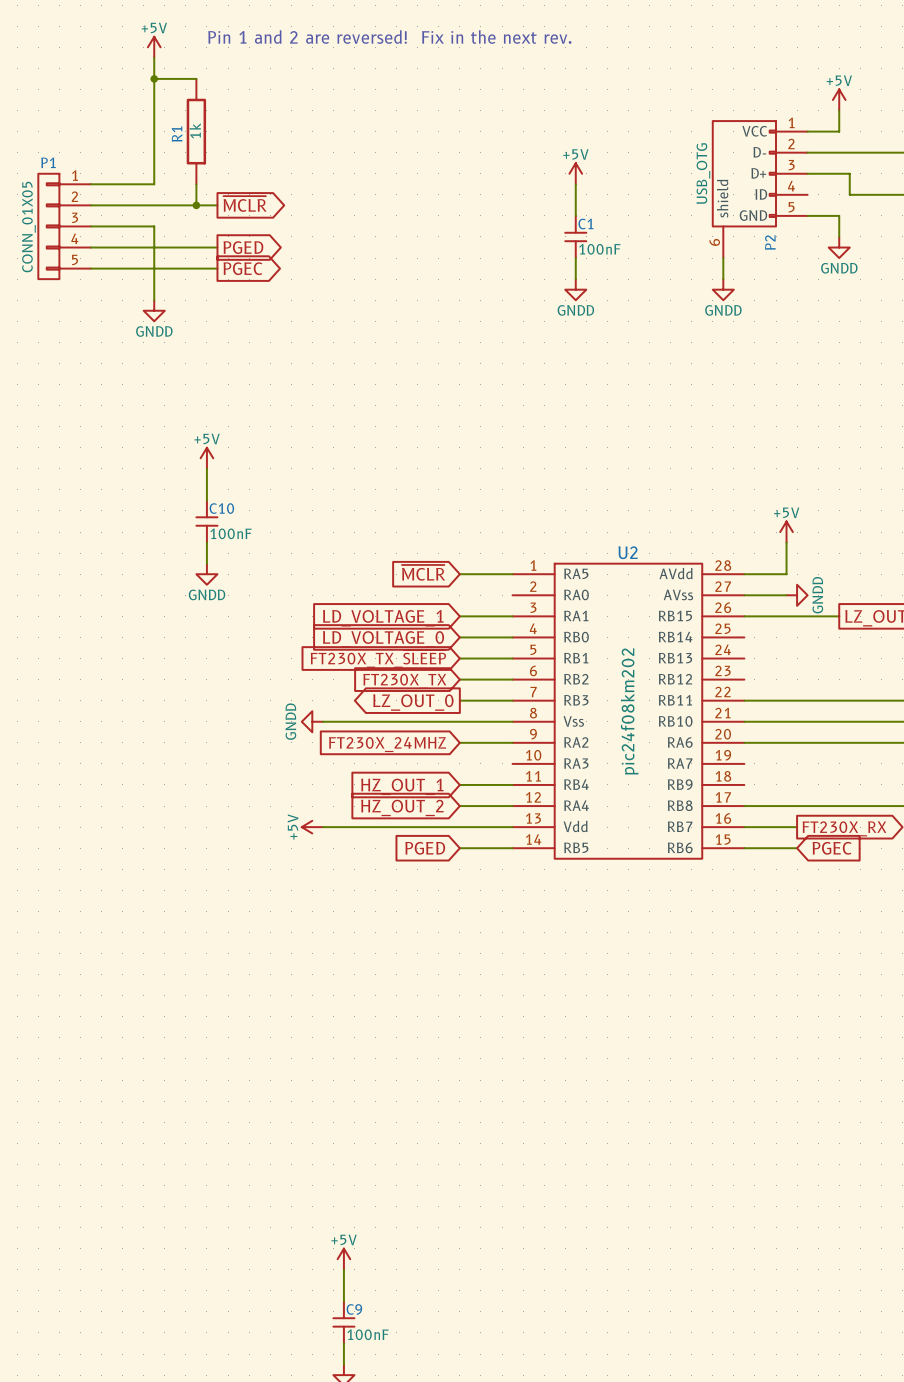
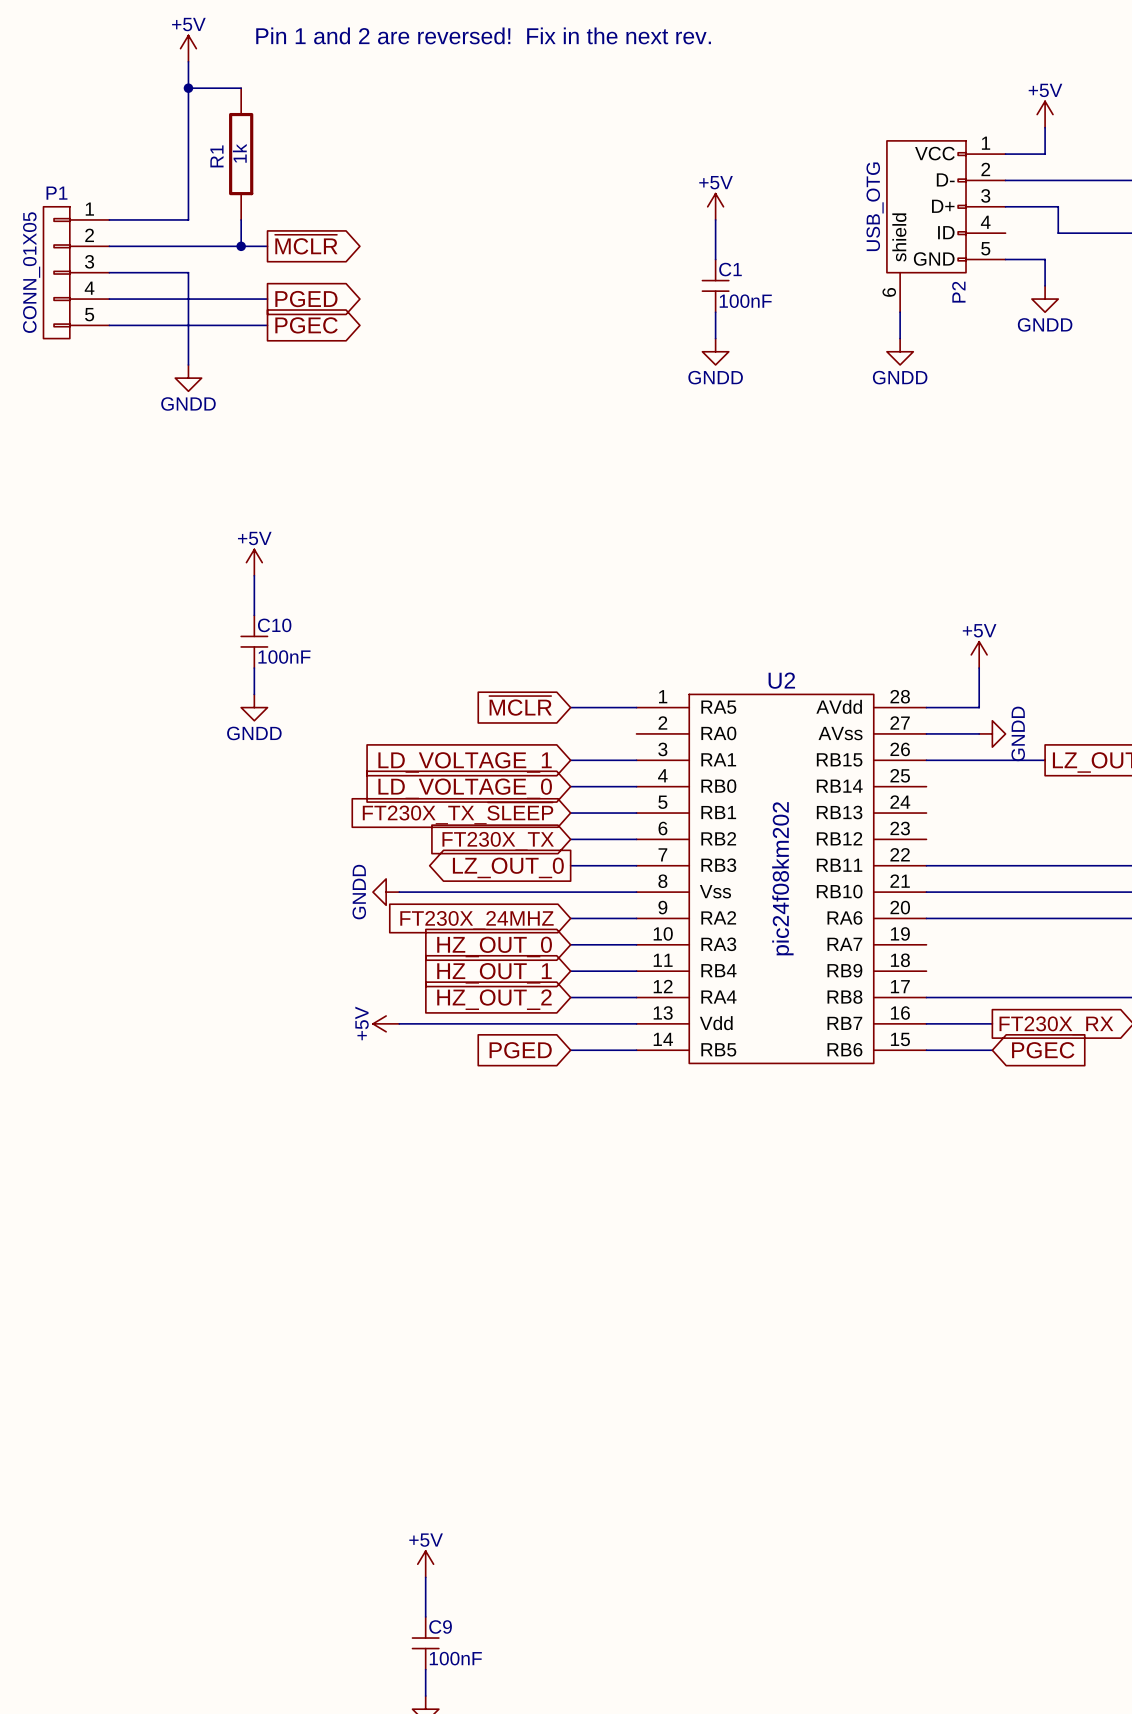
wire: none -> (570, 944) (636, 944)
global label: none -> HZ_OUT_0 (494, 946)

